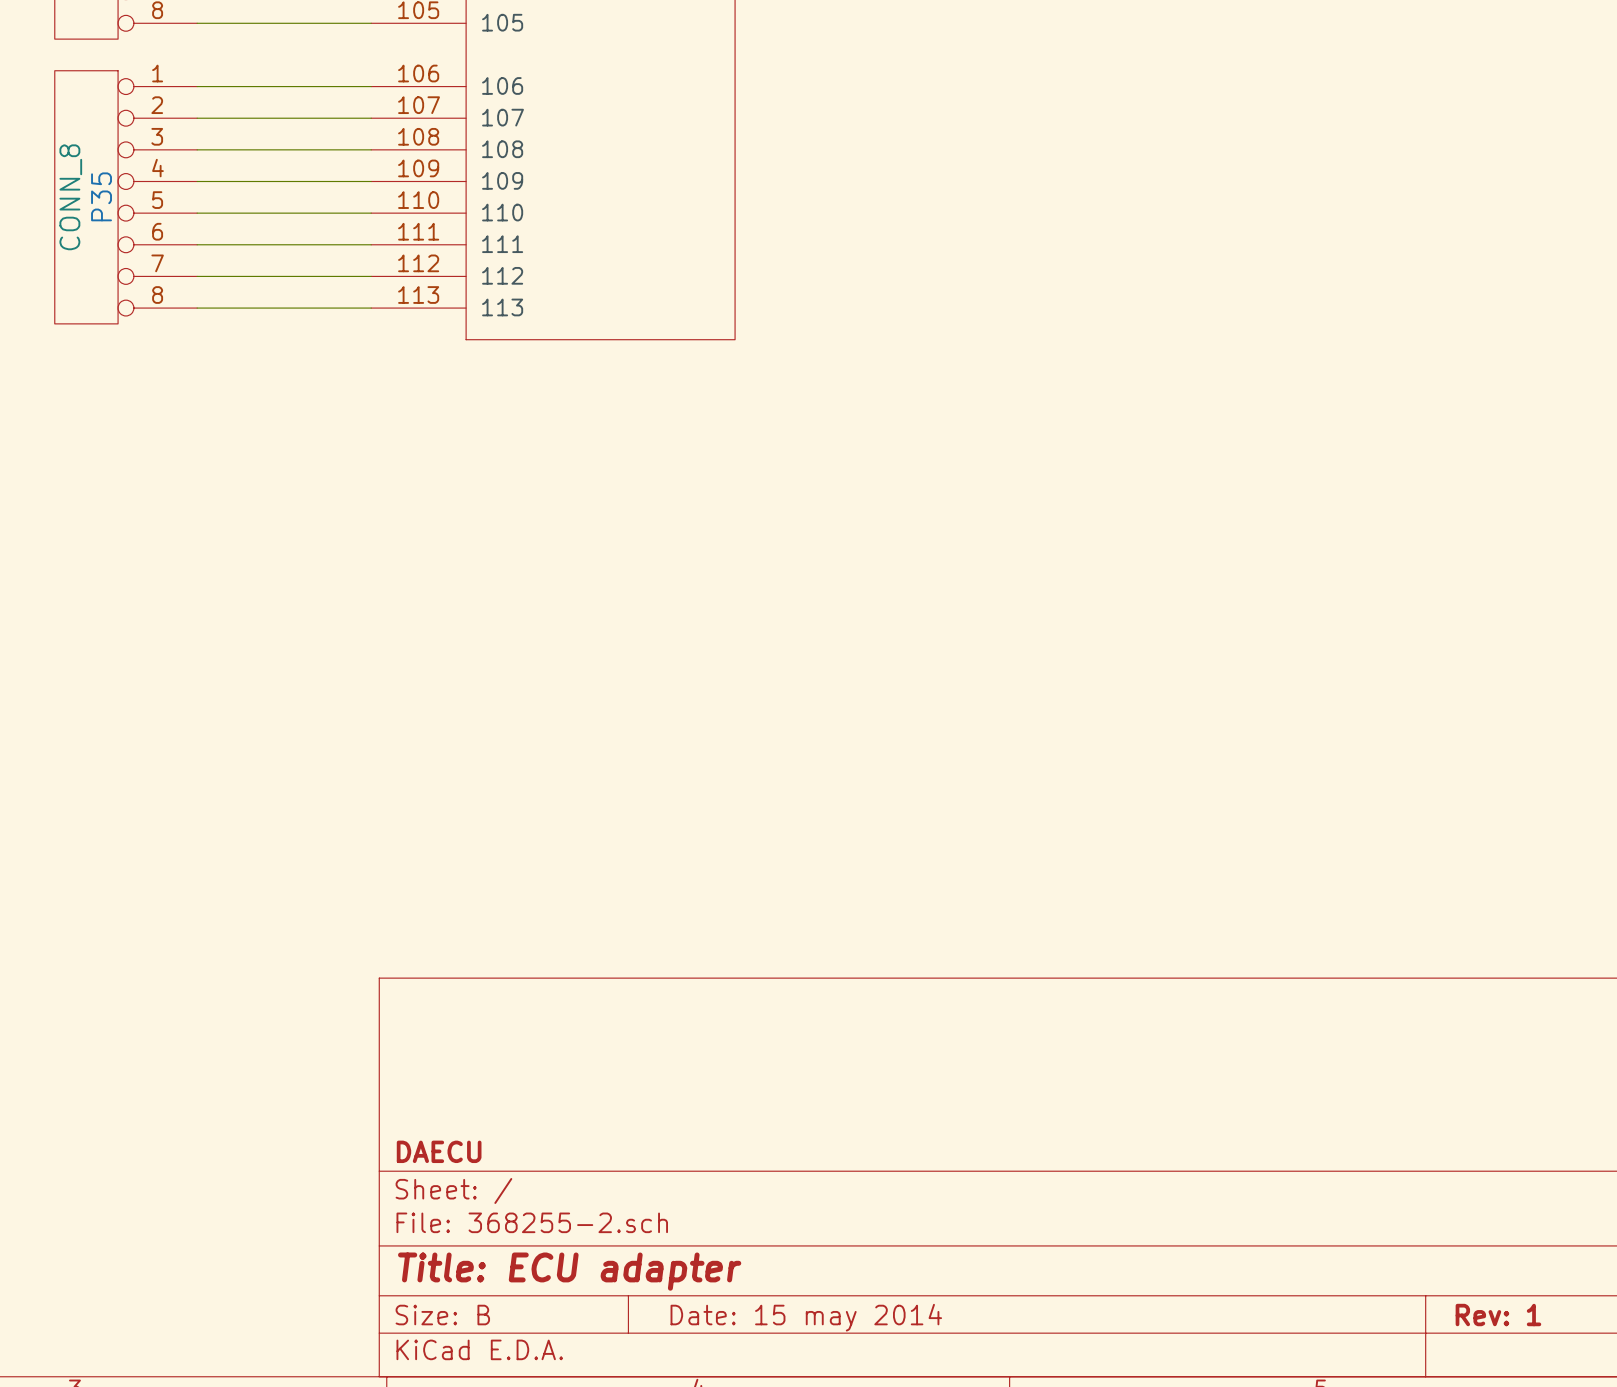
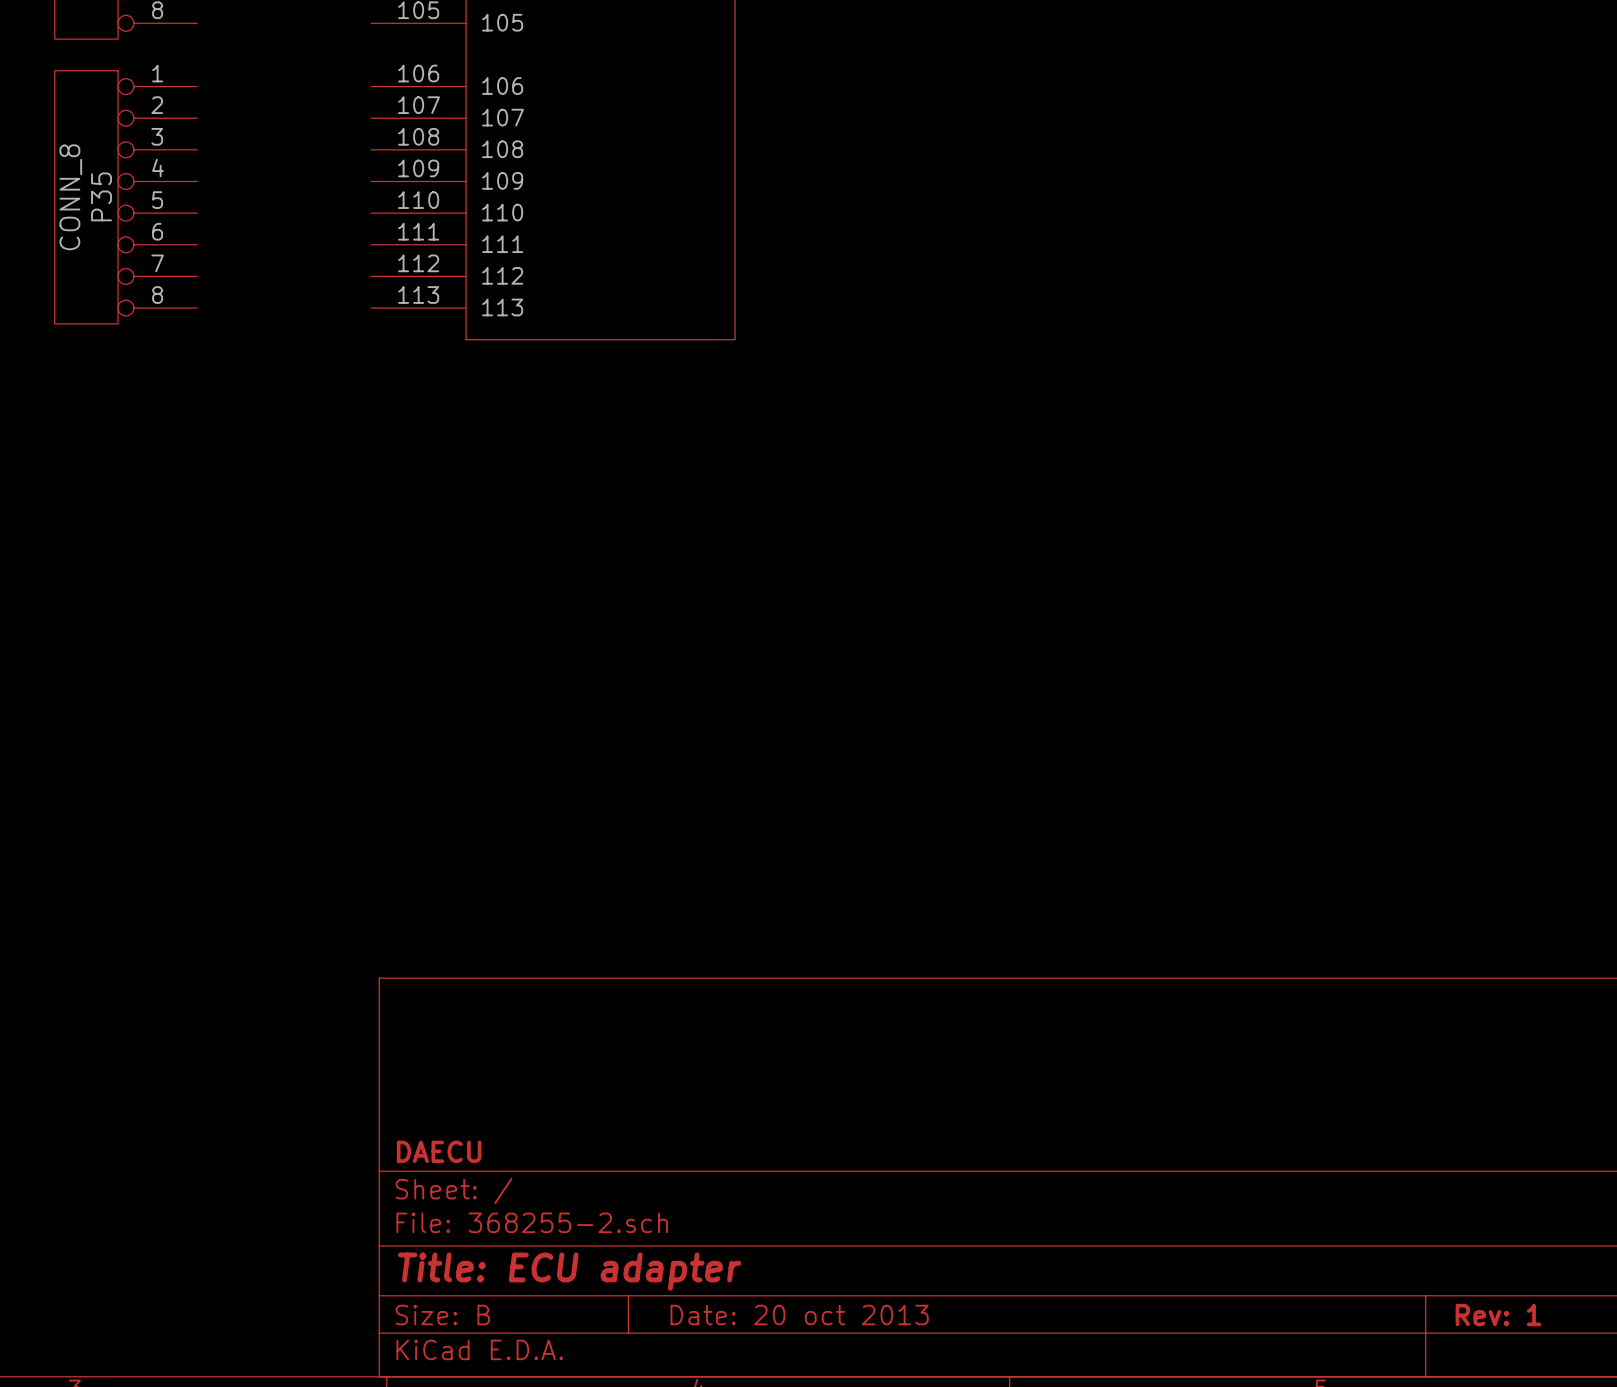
wire: (197, 23) (371, 23) -> none
wire: (197, 86) (371, 86) -> none
wire: (197, 118) (371, 118) -> none
wire: (197, 149) (371, 149) -> none
wire: (197, 181) (371, 181) -> none
wire: (197, 213) (371, 213) -> none
wire: (197, 244) (371, 244) -> none
wire: (197, 276) (371, 276) -> none
wire: (197, 308) (371, 308) -> none
title block: Date: 15 may 2014 (806, 1317) -> Date: 20 oct 2013 (799, 1315)

